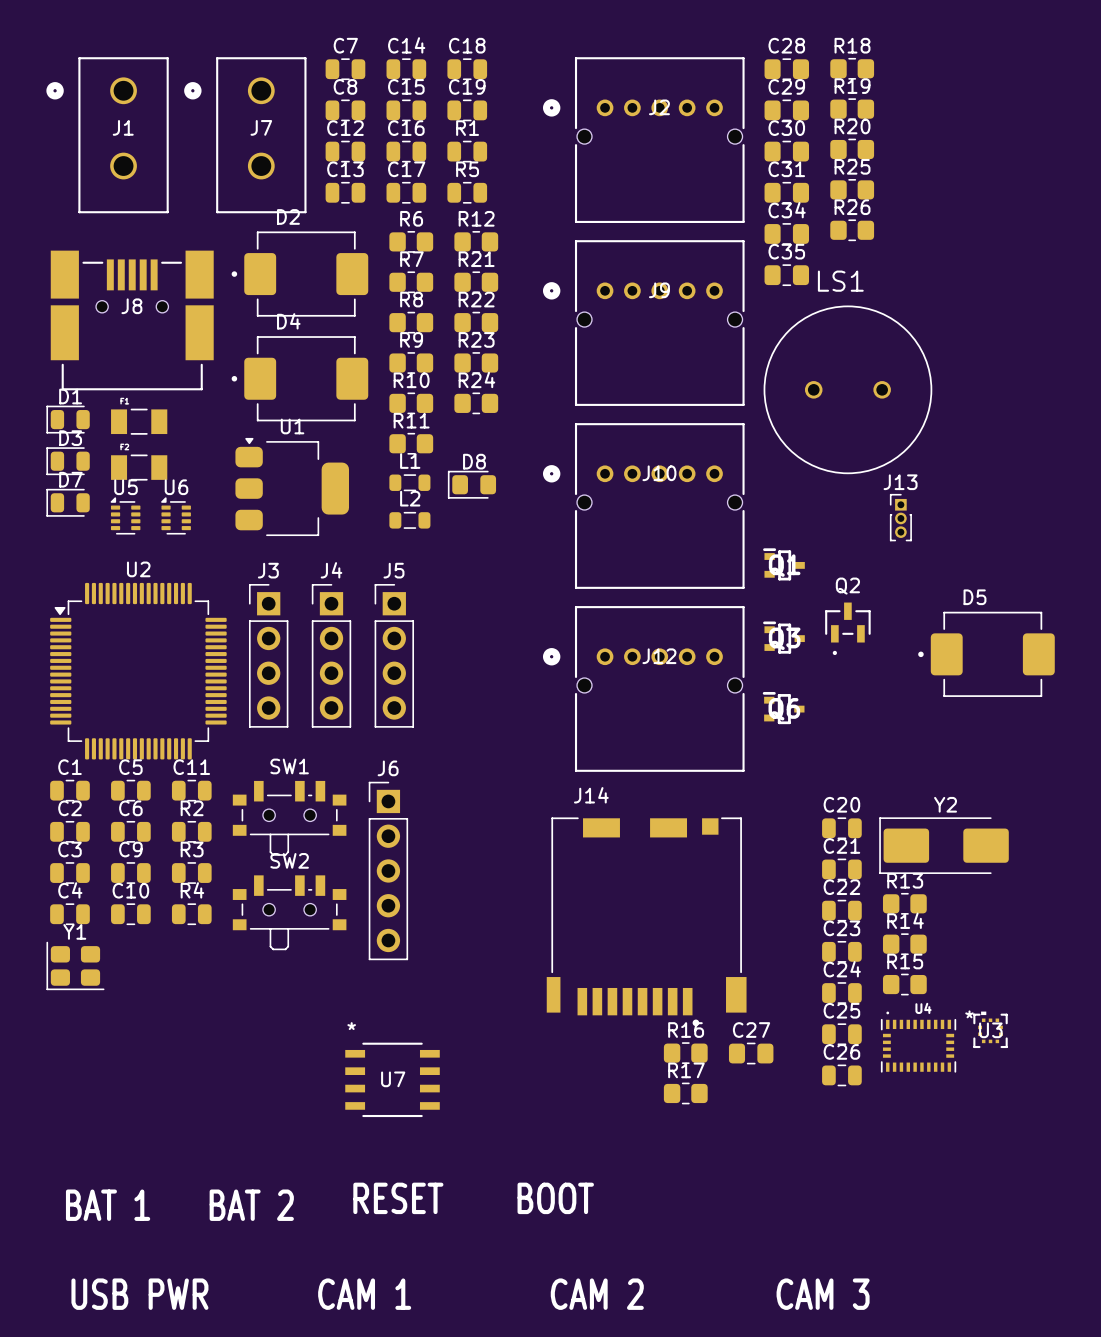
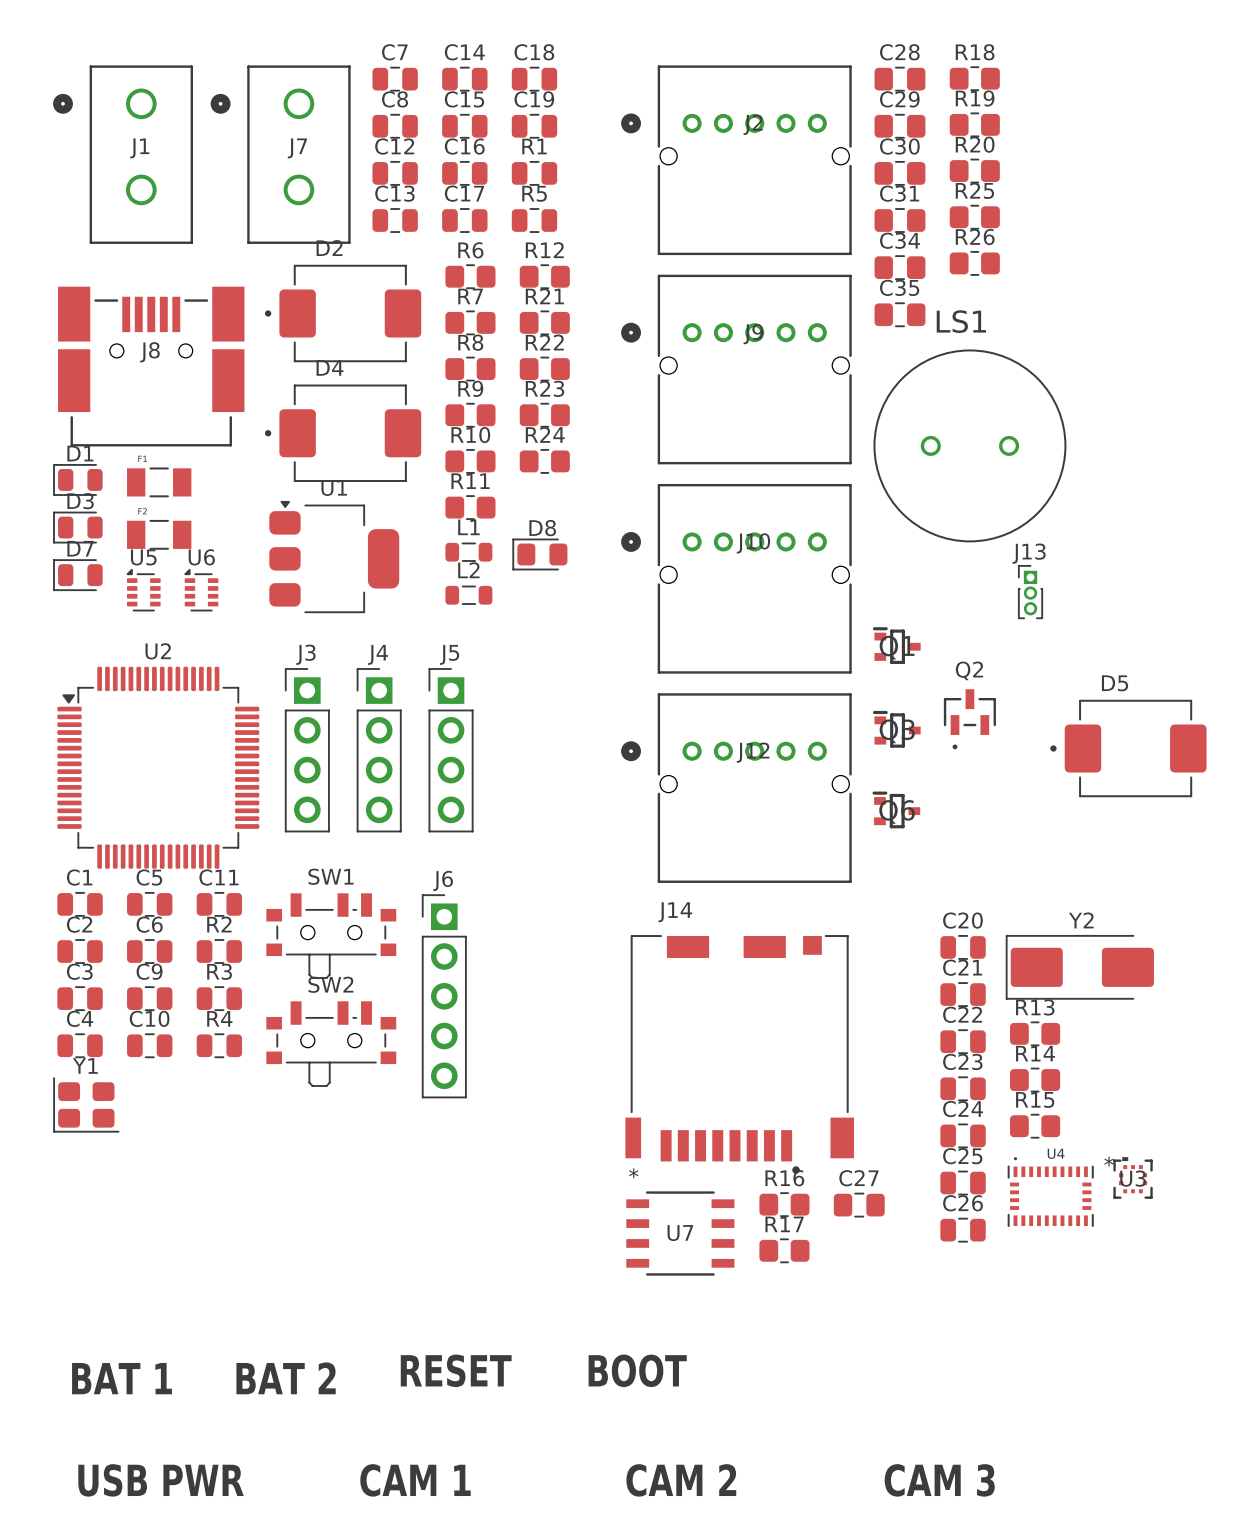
U7 footprint: [345, 1042, 440, 1118] -> [626, 1191, 735, 1276]

